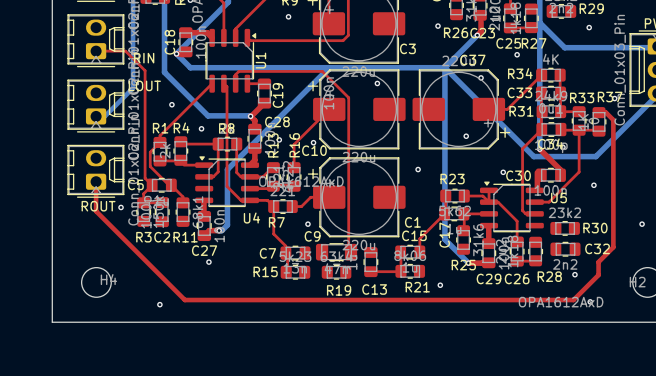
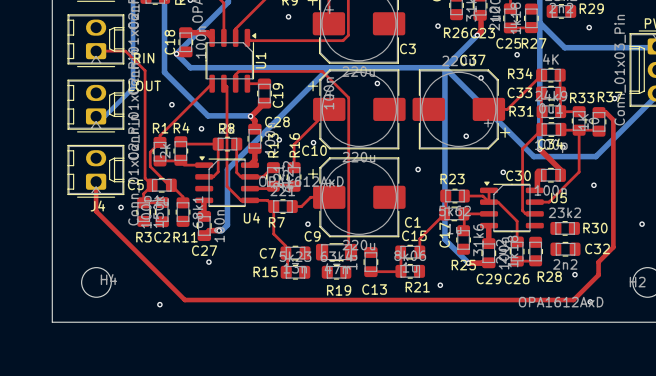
ROUT name: ROUT (98, 206) -> J4 (97, 205)

